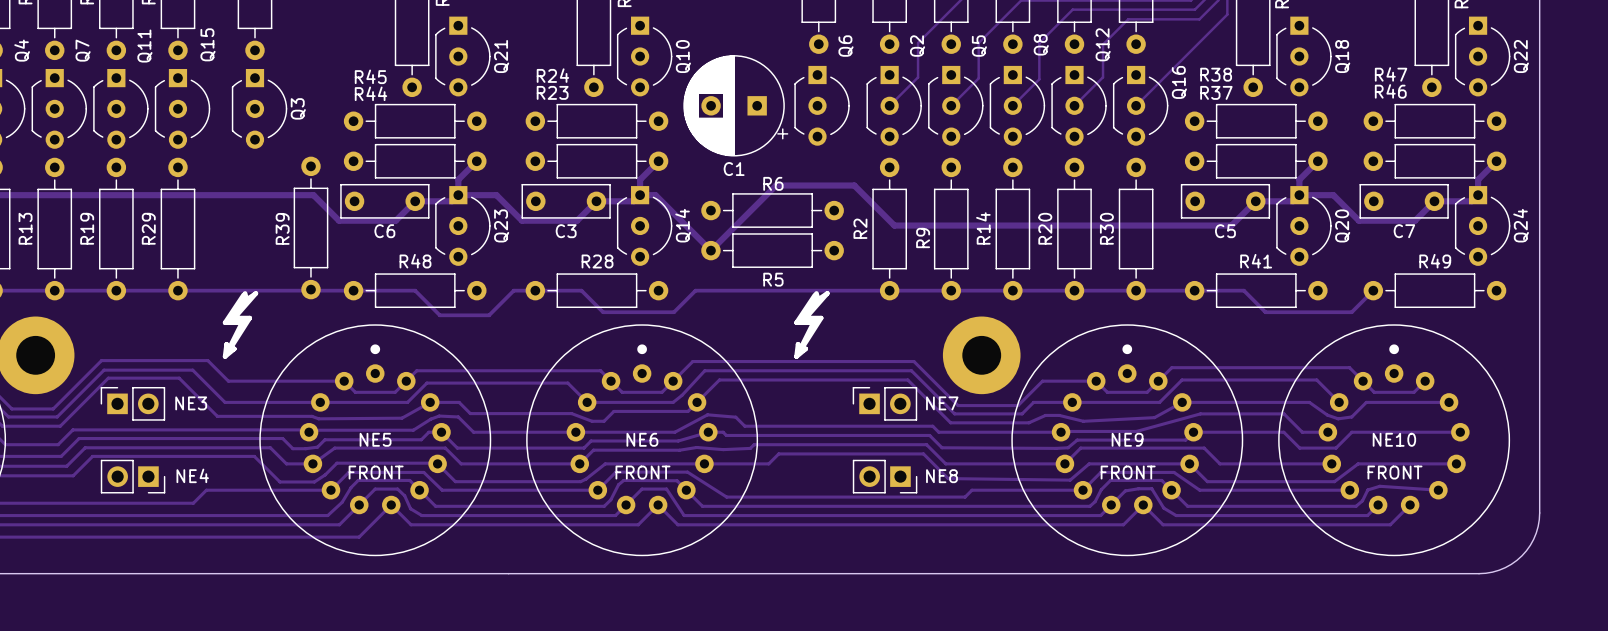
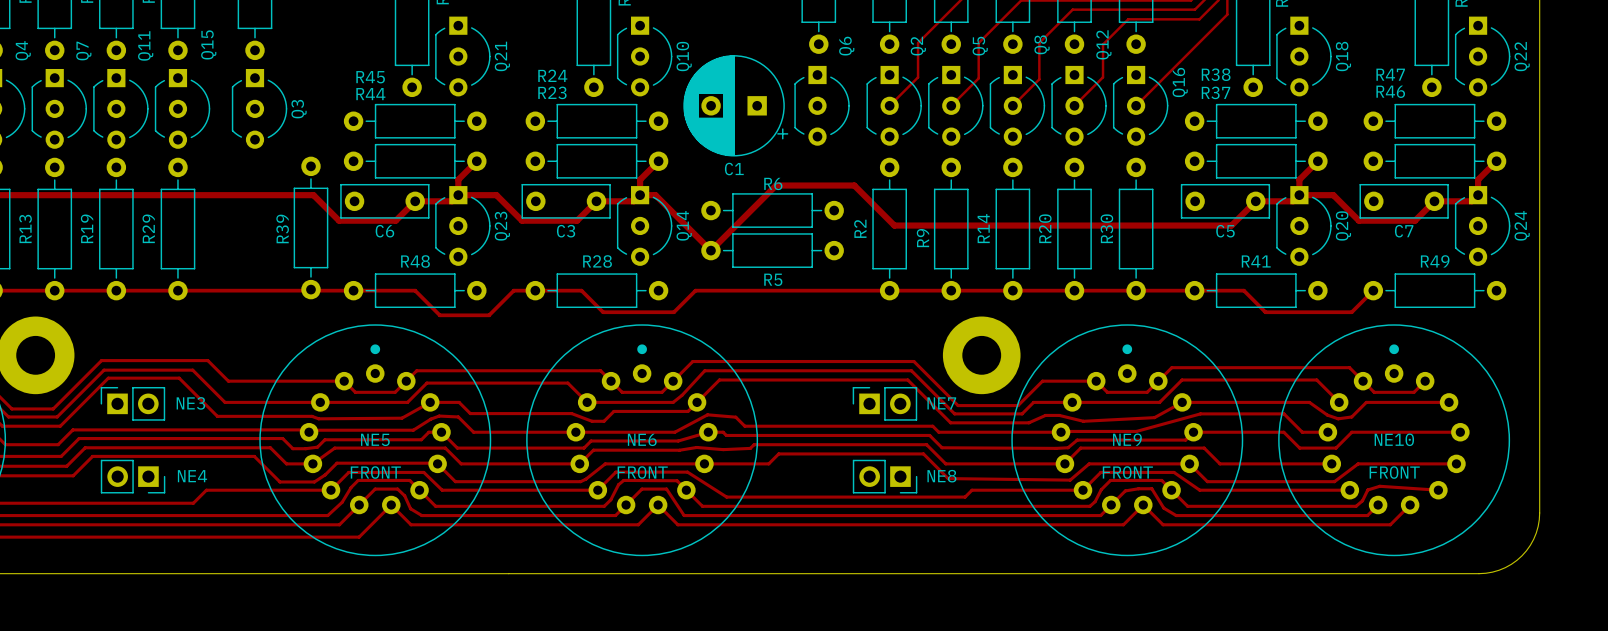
drawing: [222, 291, 259, 359] -> none
drawing: [794, 291, 830, 359] -> none

